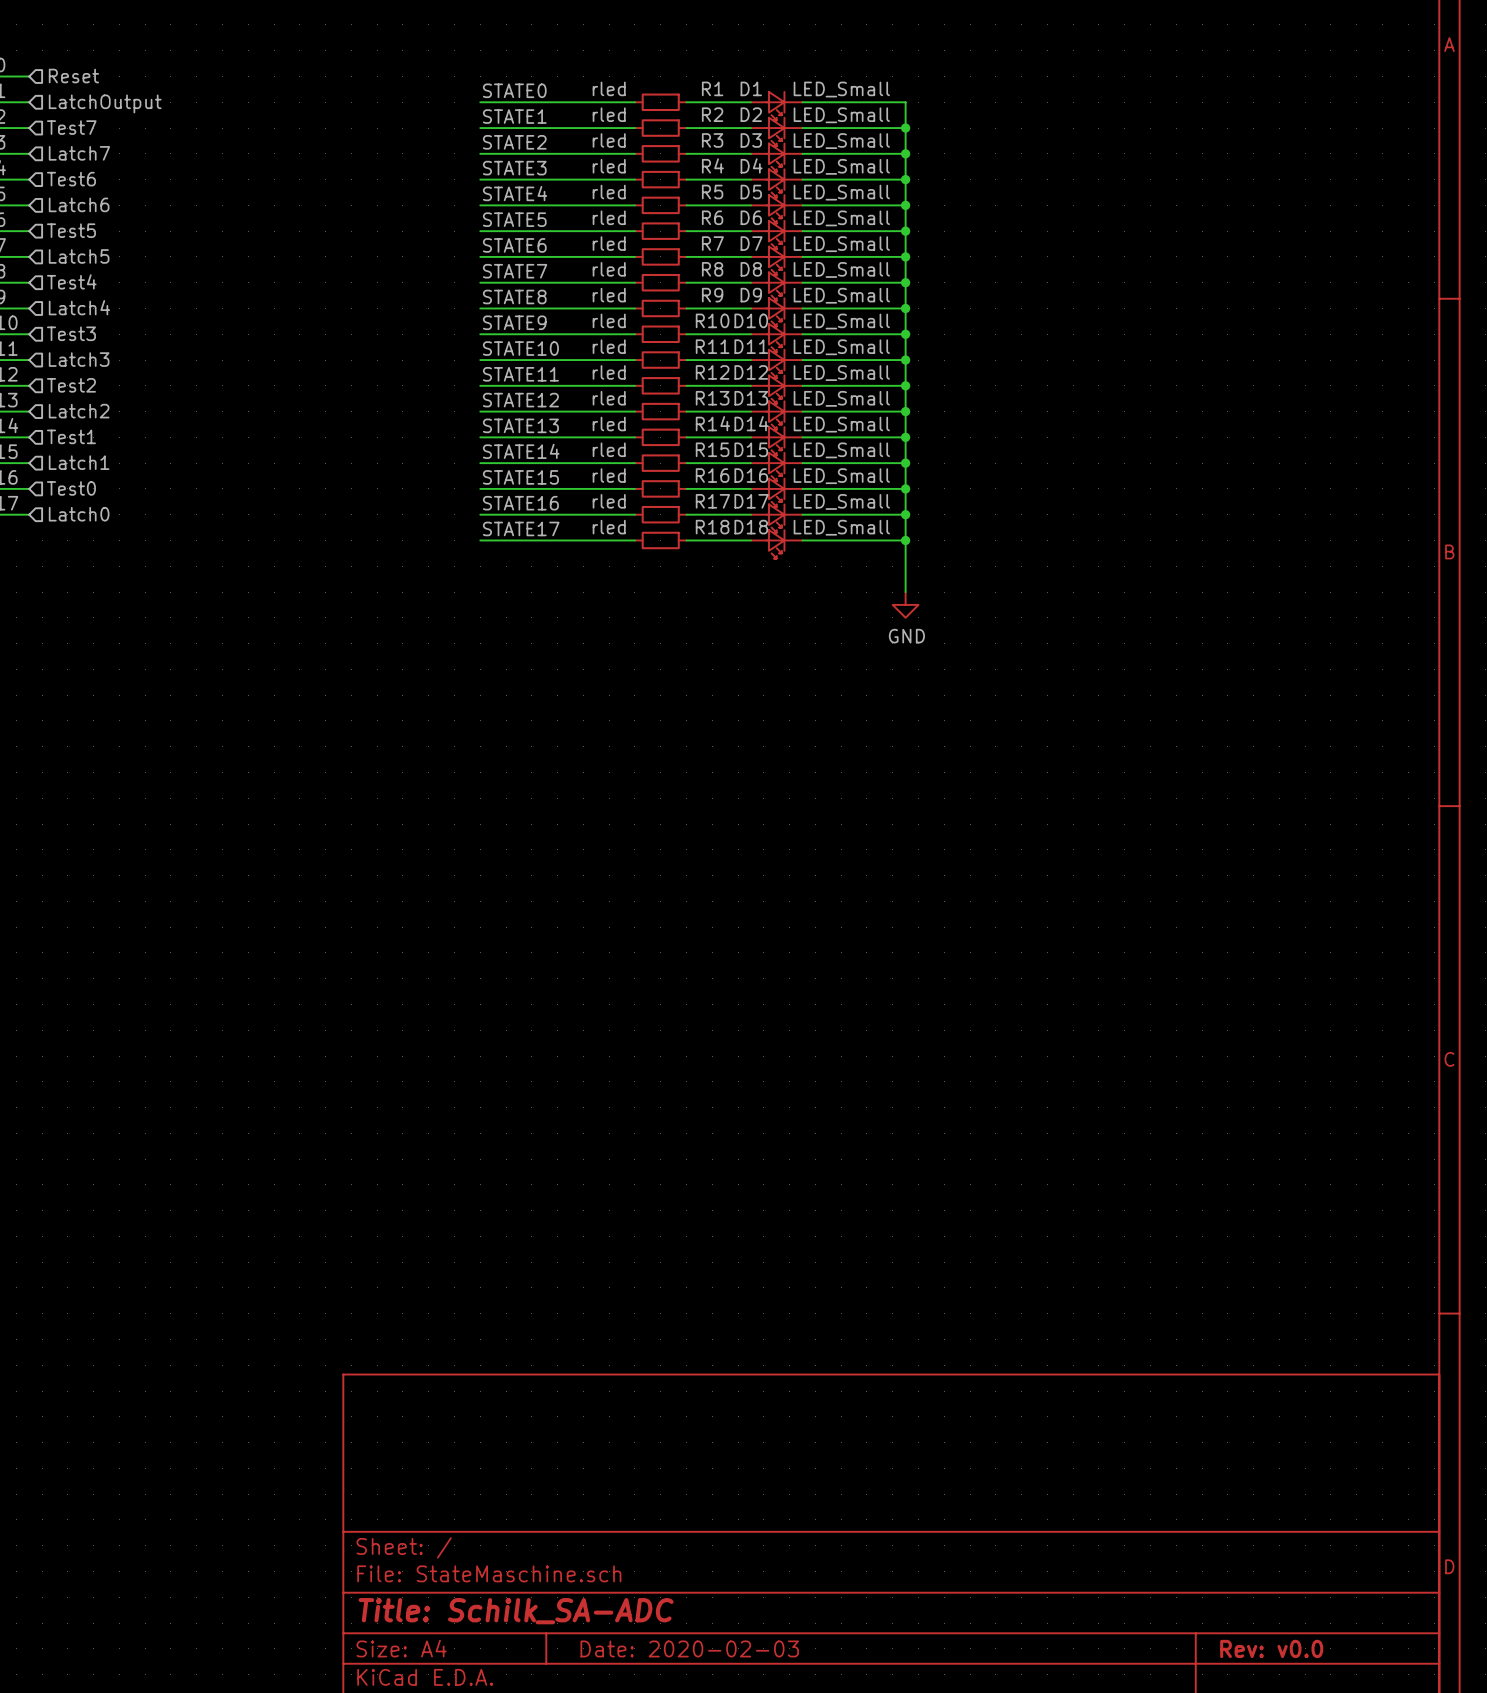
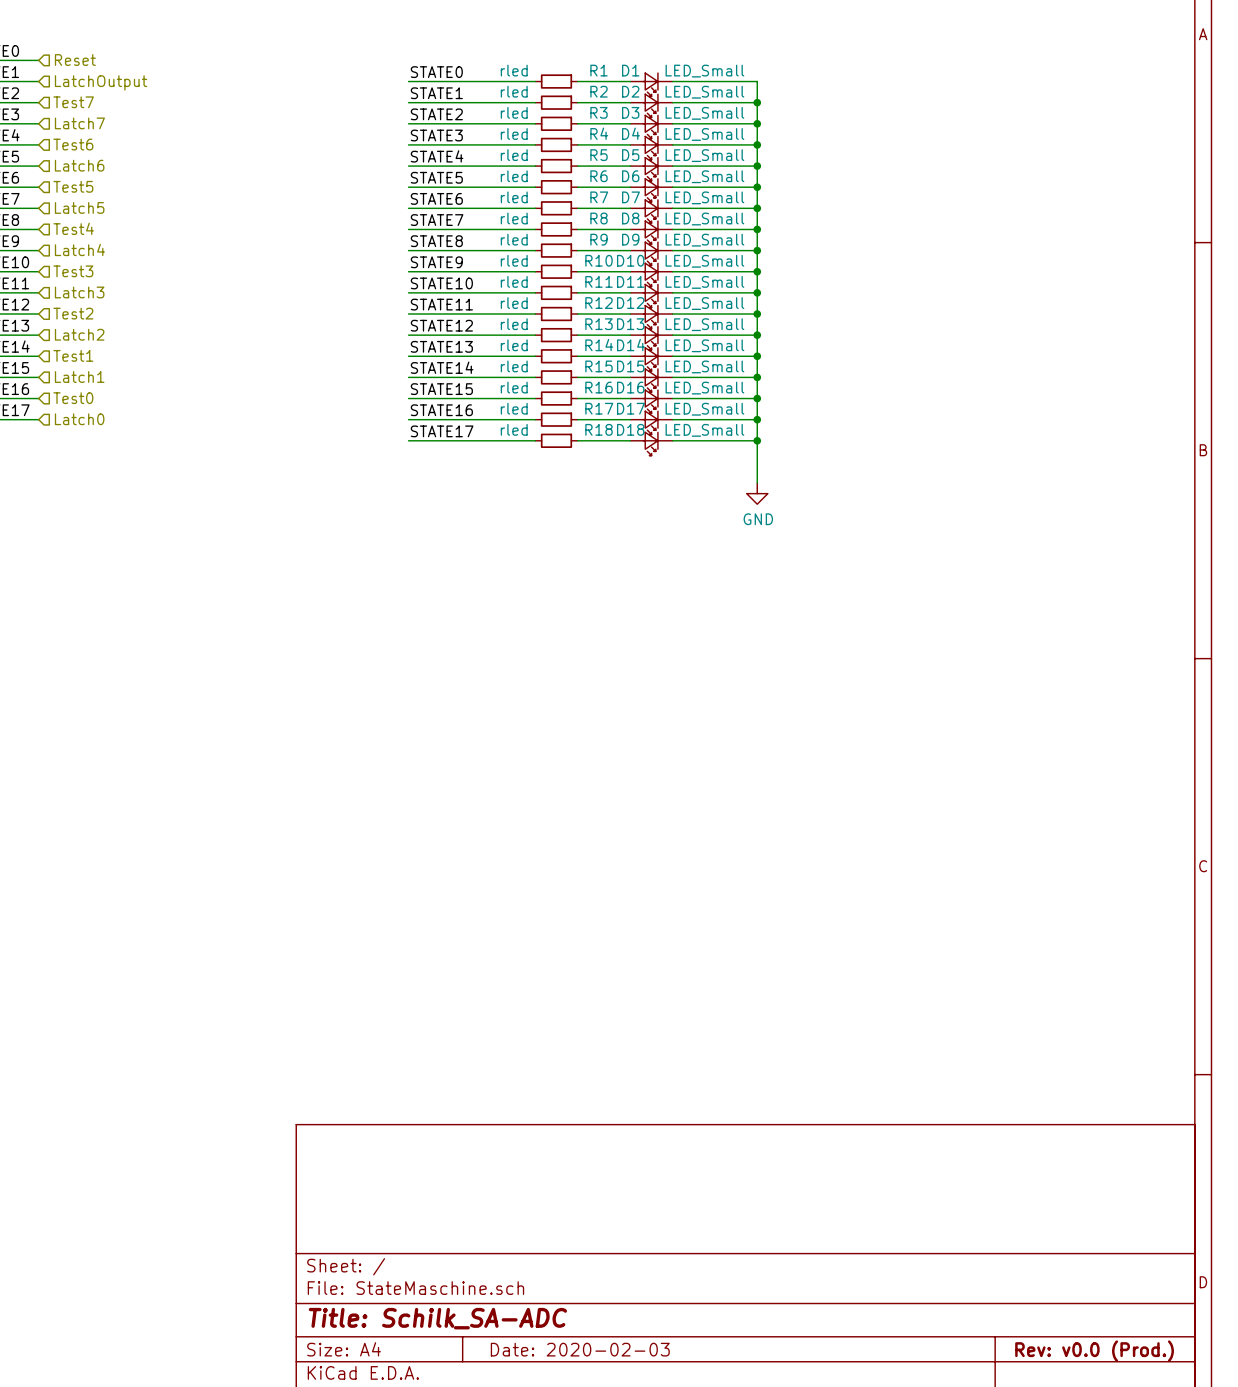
title block: Rev: v0.0 (1271, 1648) -> Rev: v0.0 (Prod.) (1094, 1351)

